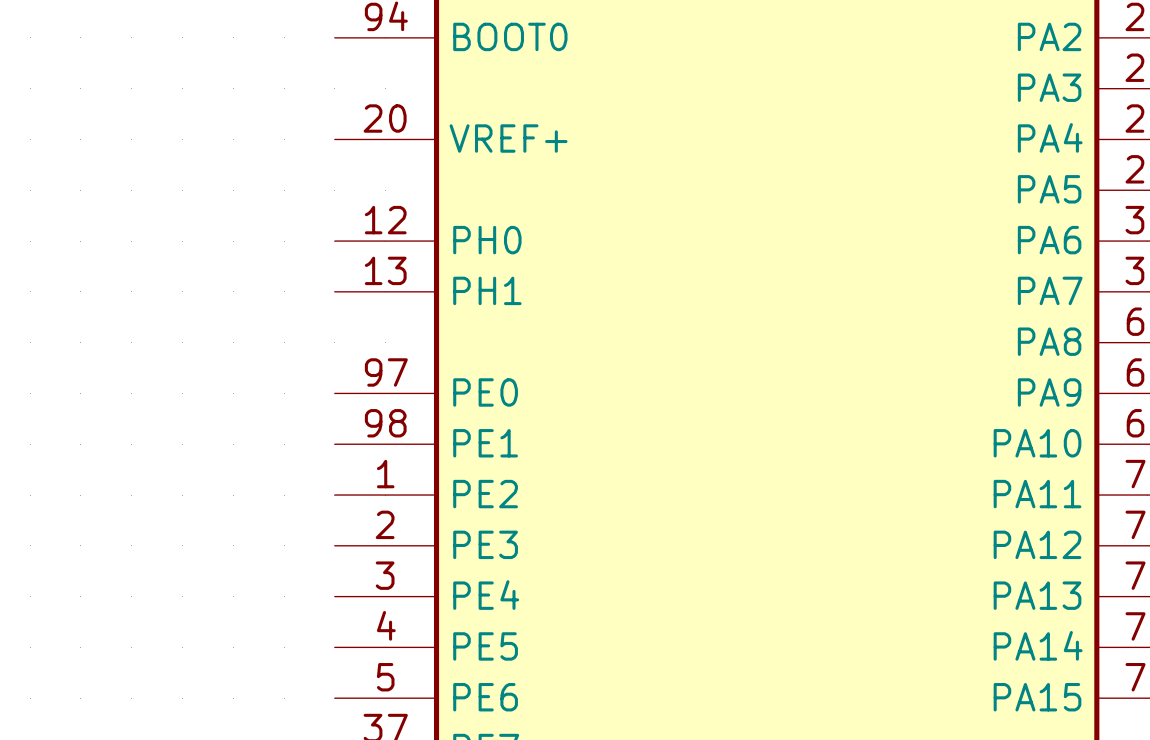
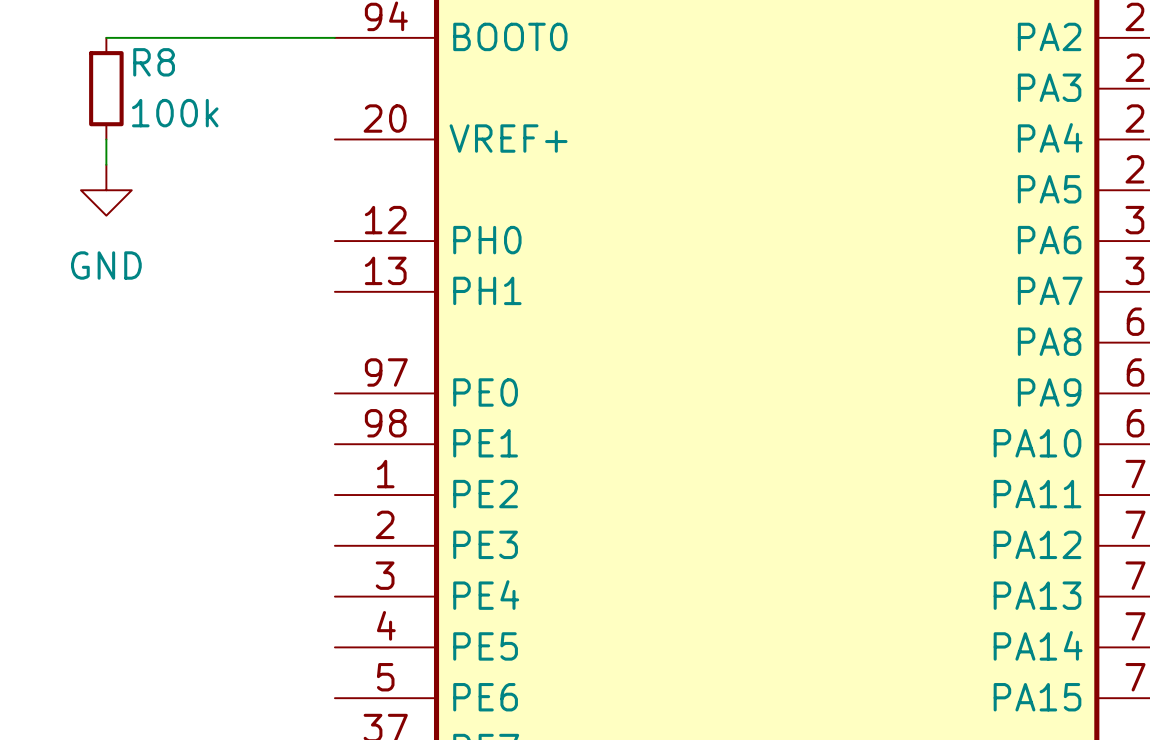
wire: none -> (106, 37) (334, 37)
R8: none -> 100k (106, 88)
wire: none -> (106, 139) (106, 164)
power symbol: none -> GND (106, 190)

